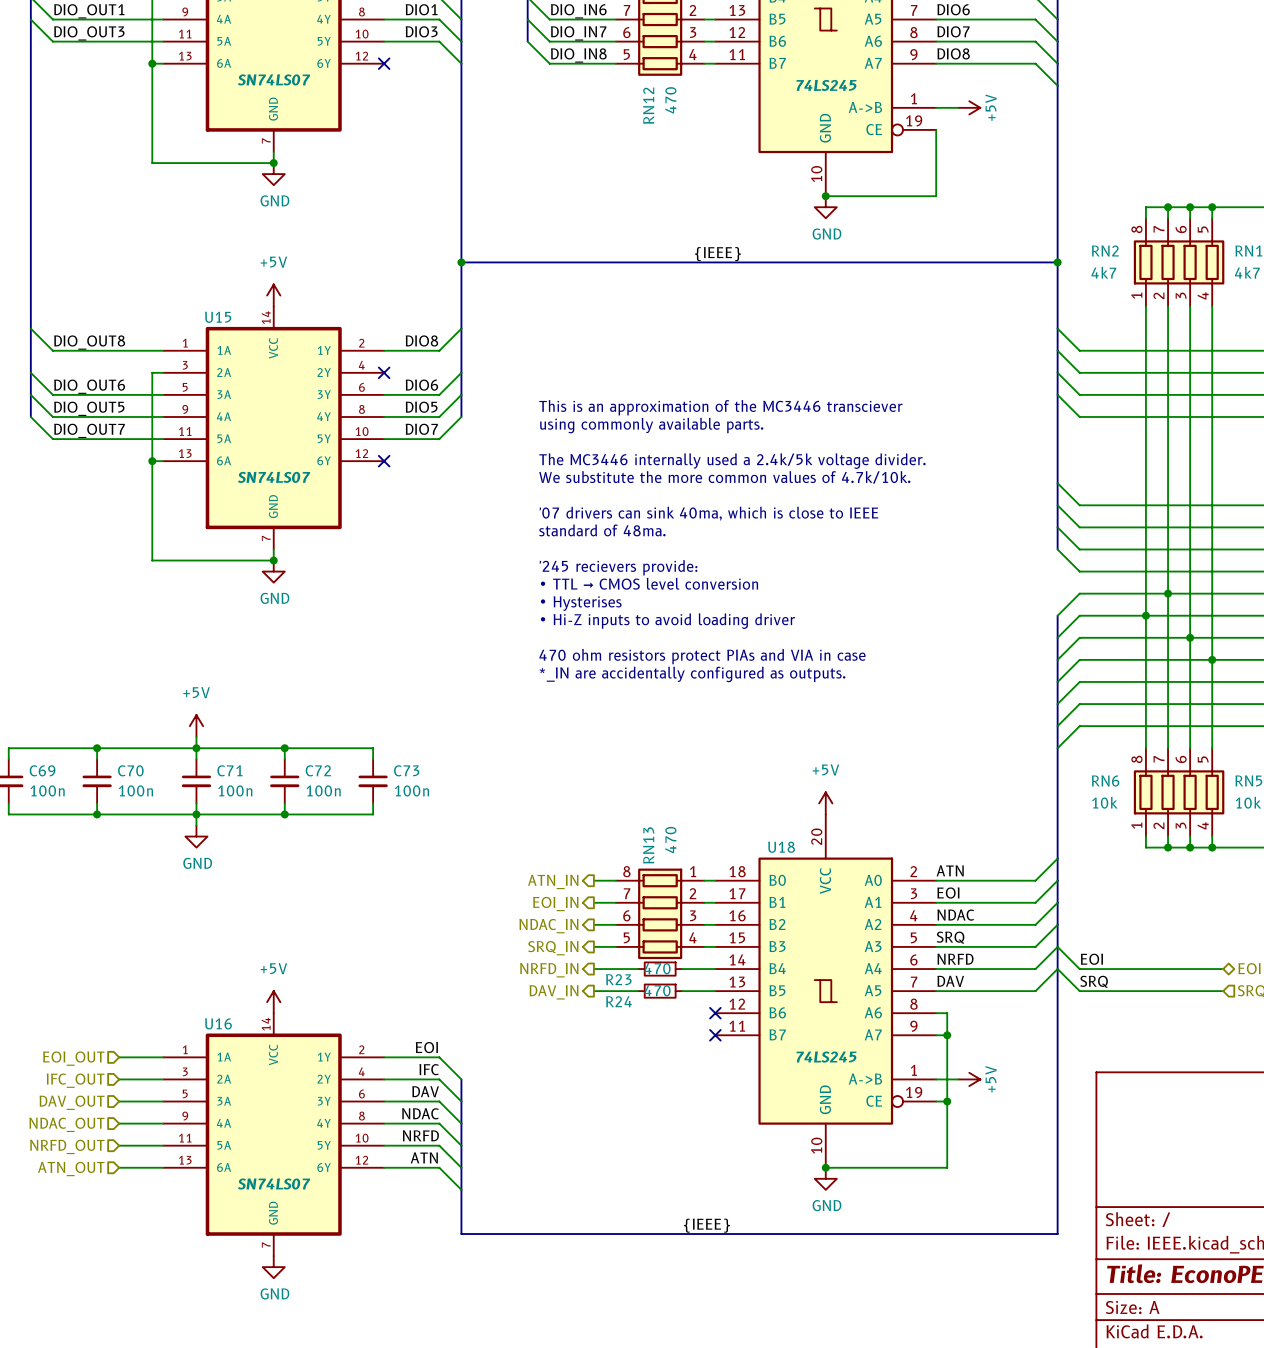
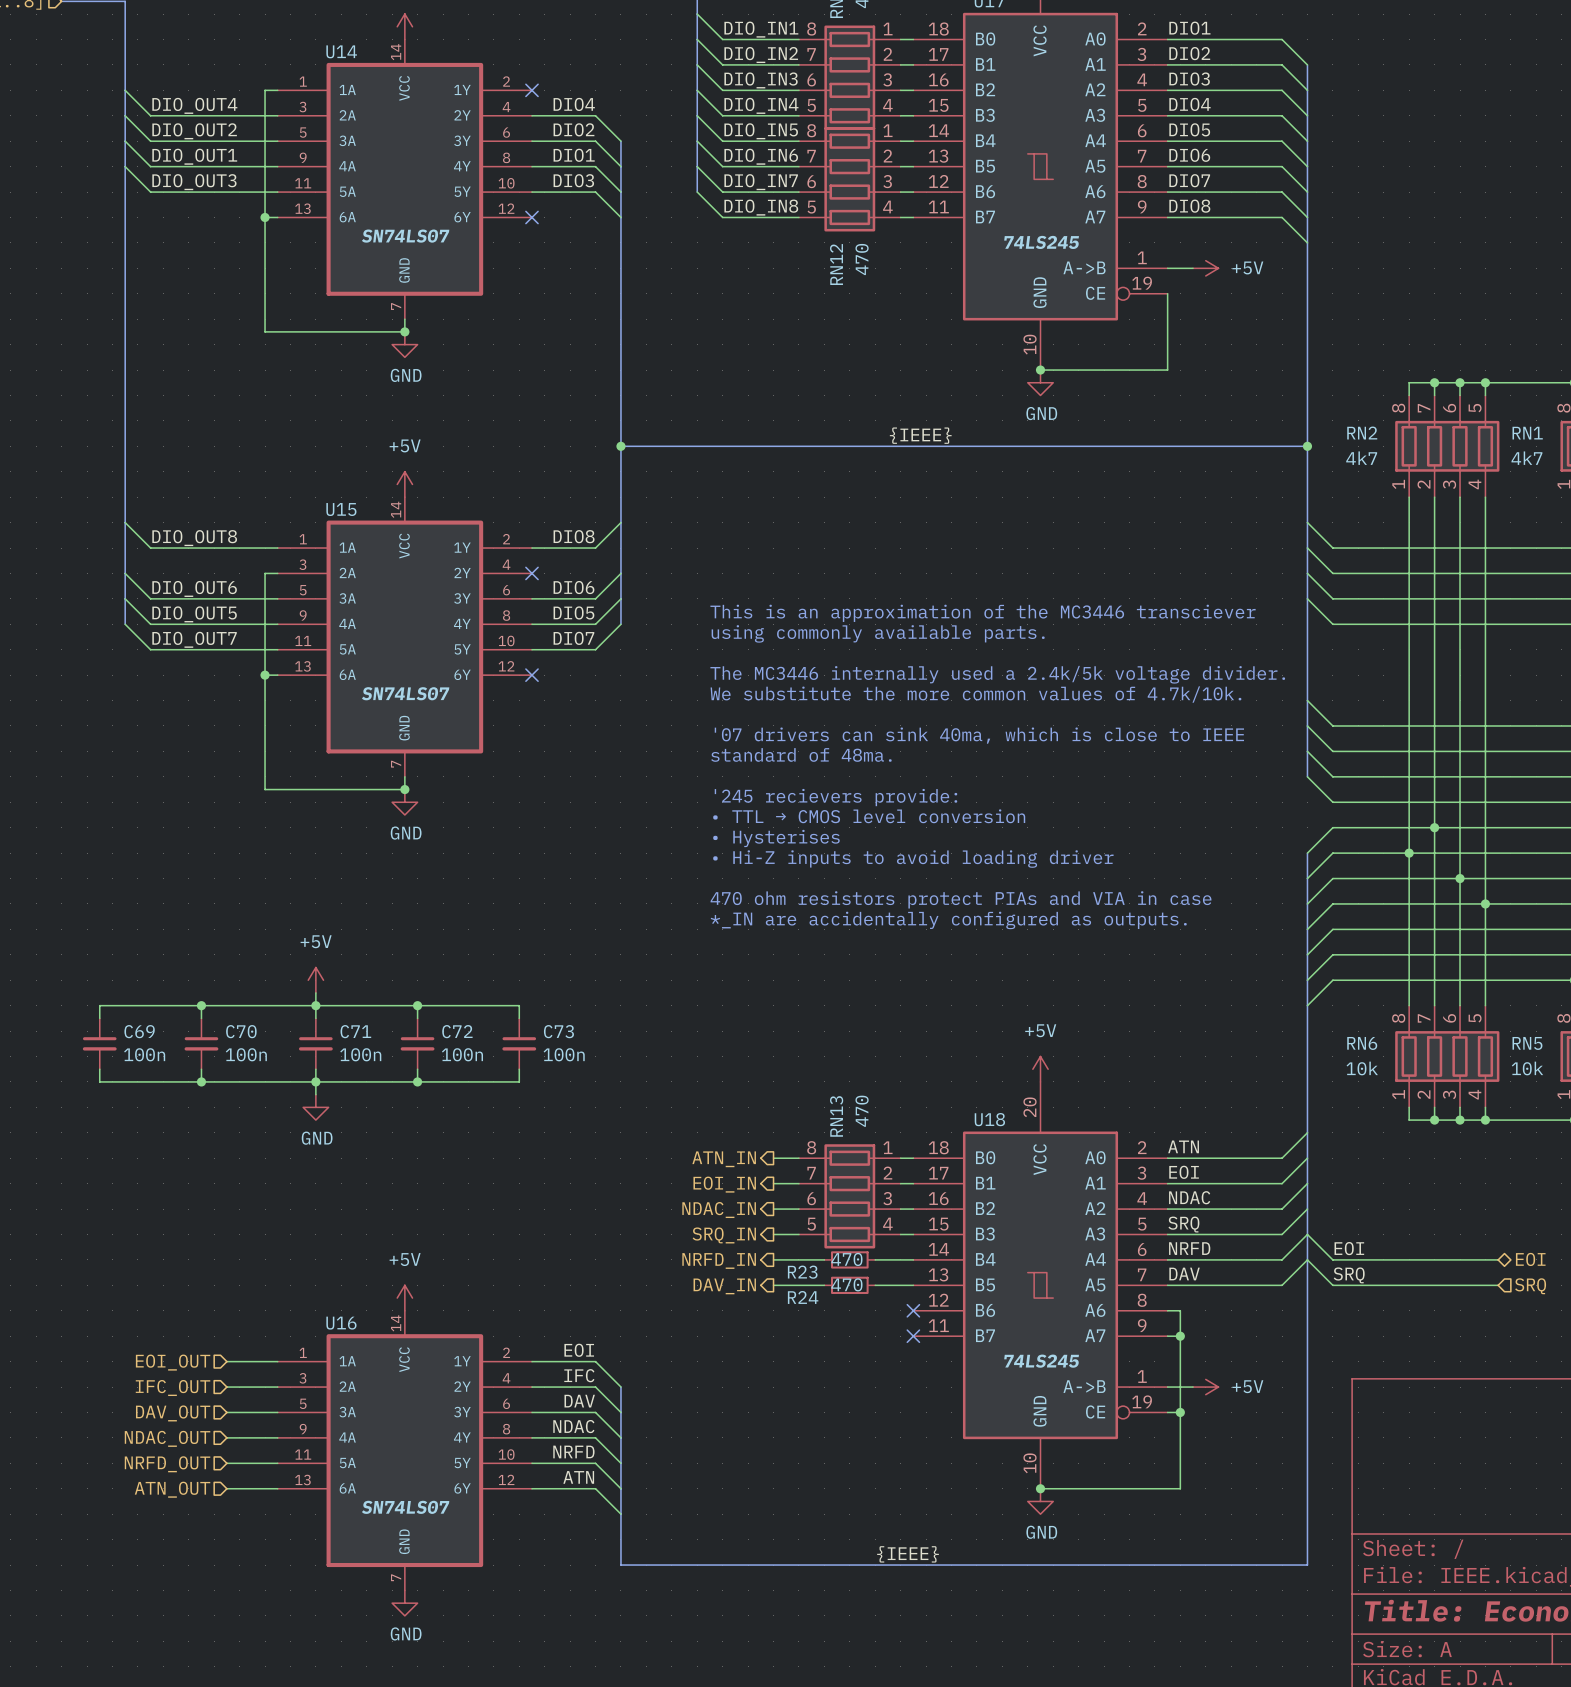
power symbol text rotation: 0° (991, 107) -> 90° clockwise (1247, 267)
power symbol text rotation: 0° (991, 1079) -> 90° clockwise (1247, 1386)

